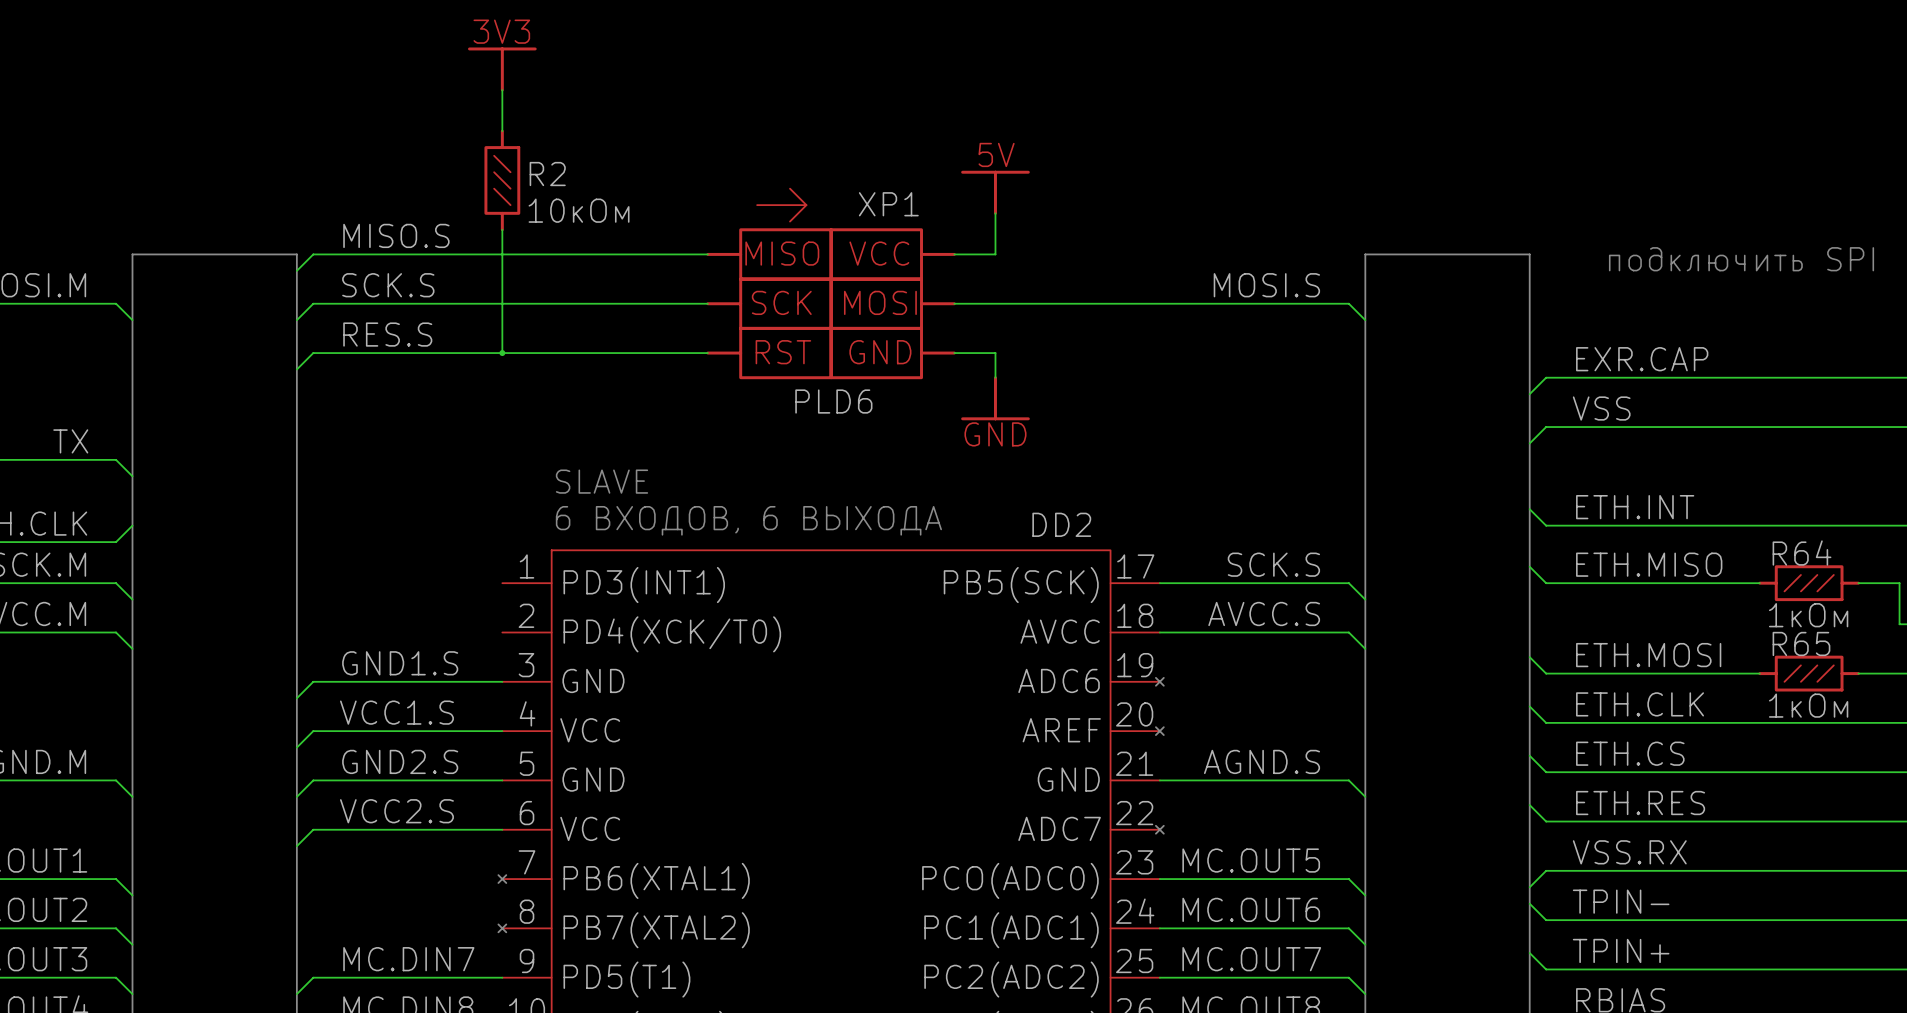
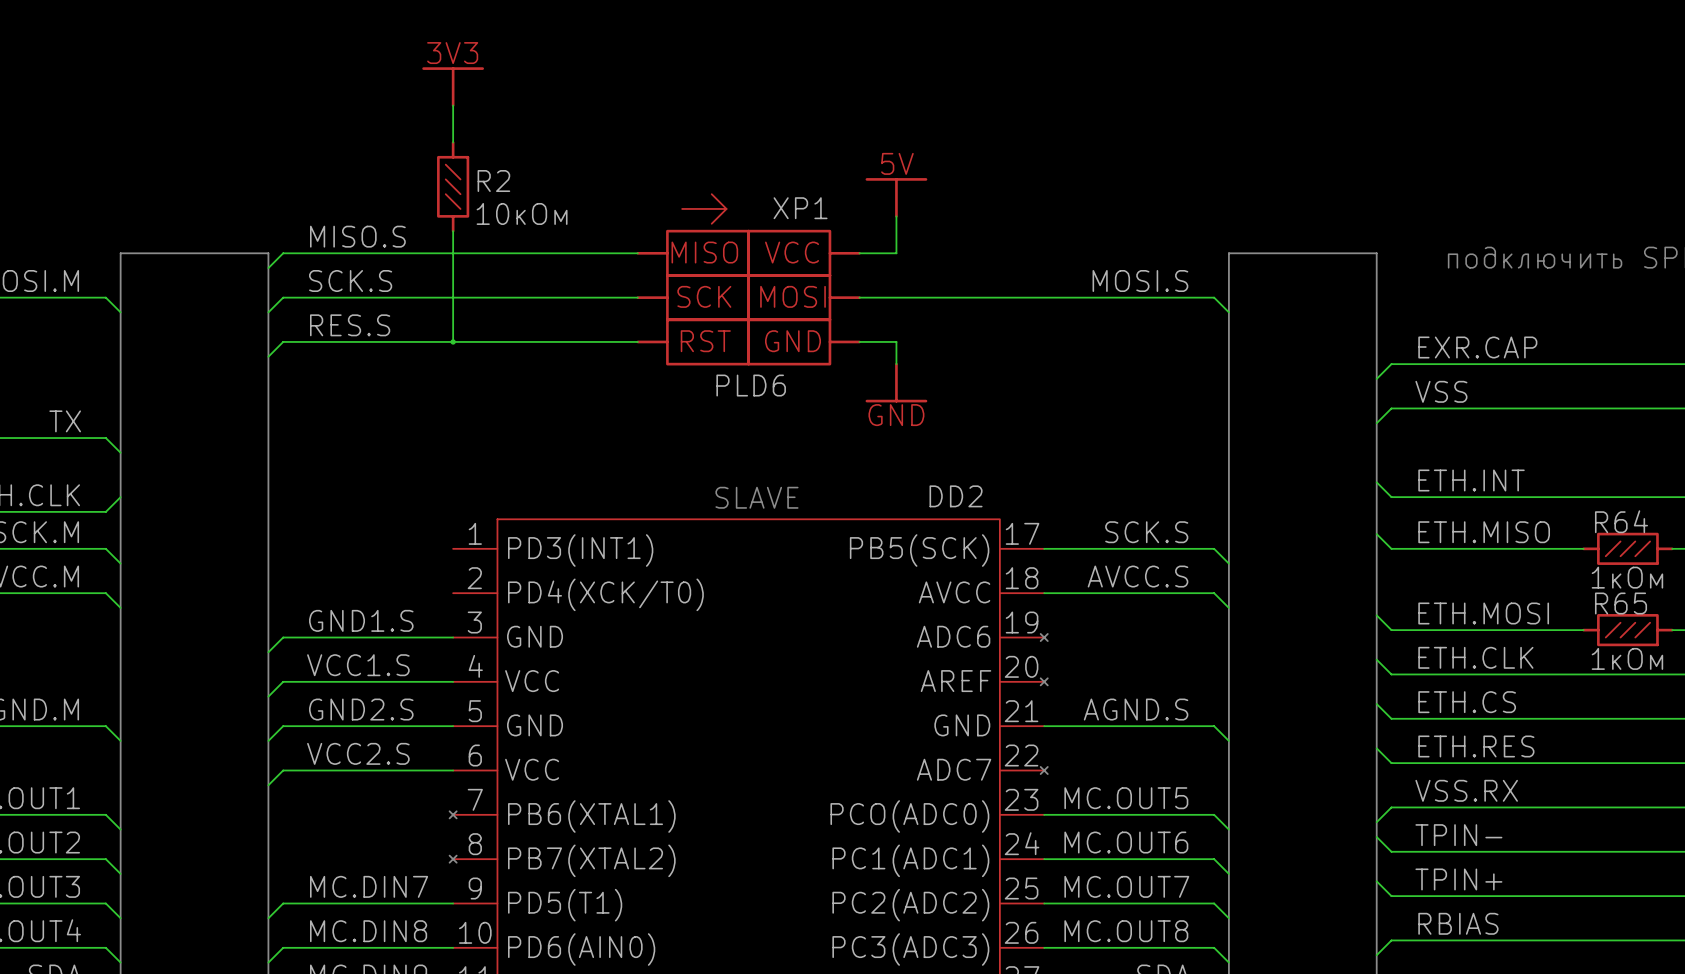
text: SLAVE (602, 481) -> none
text: 6 ВХОДОВ, 6 ВЫХОДА (748, 520) -> none
text: none -> SLAVE (756, 497)

